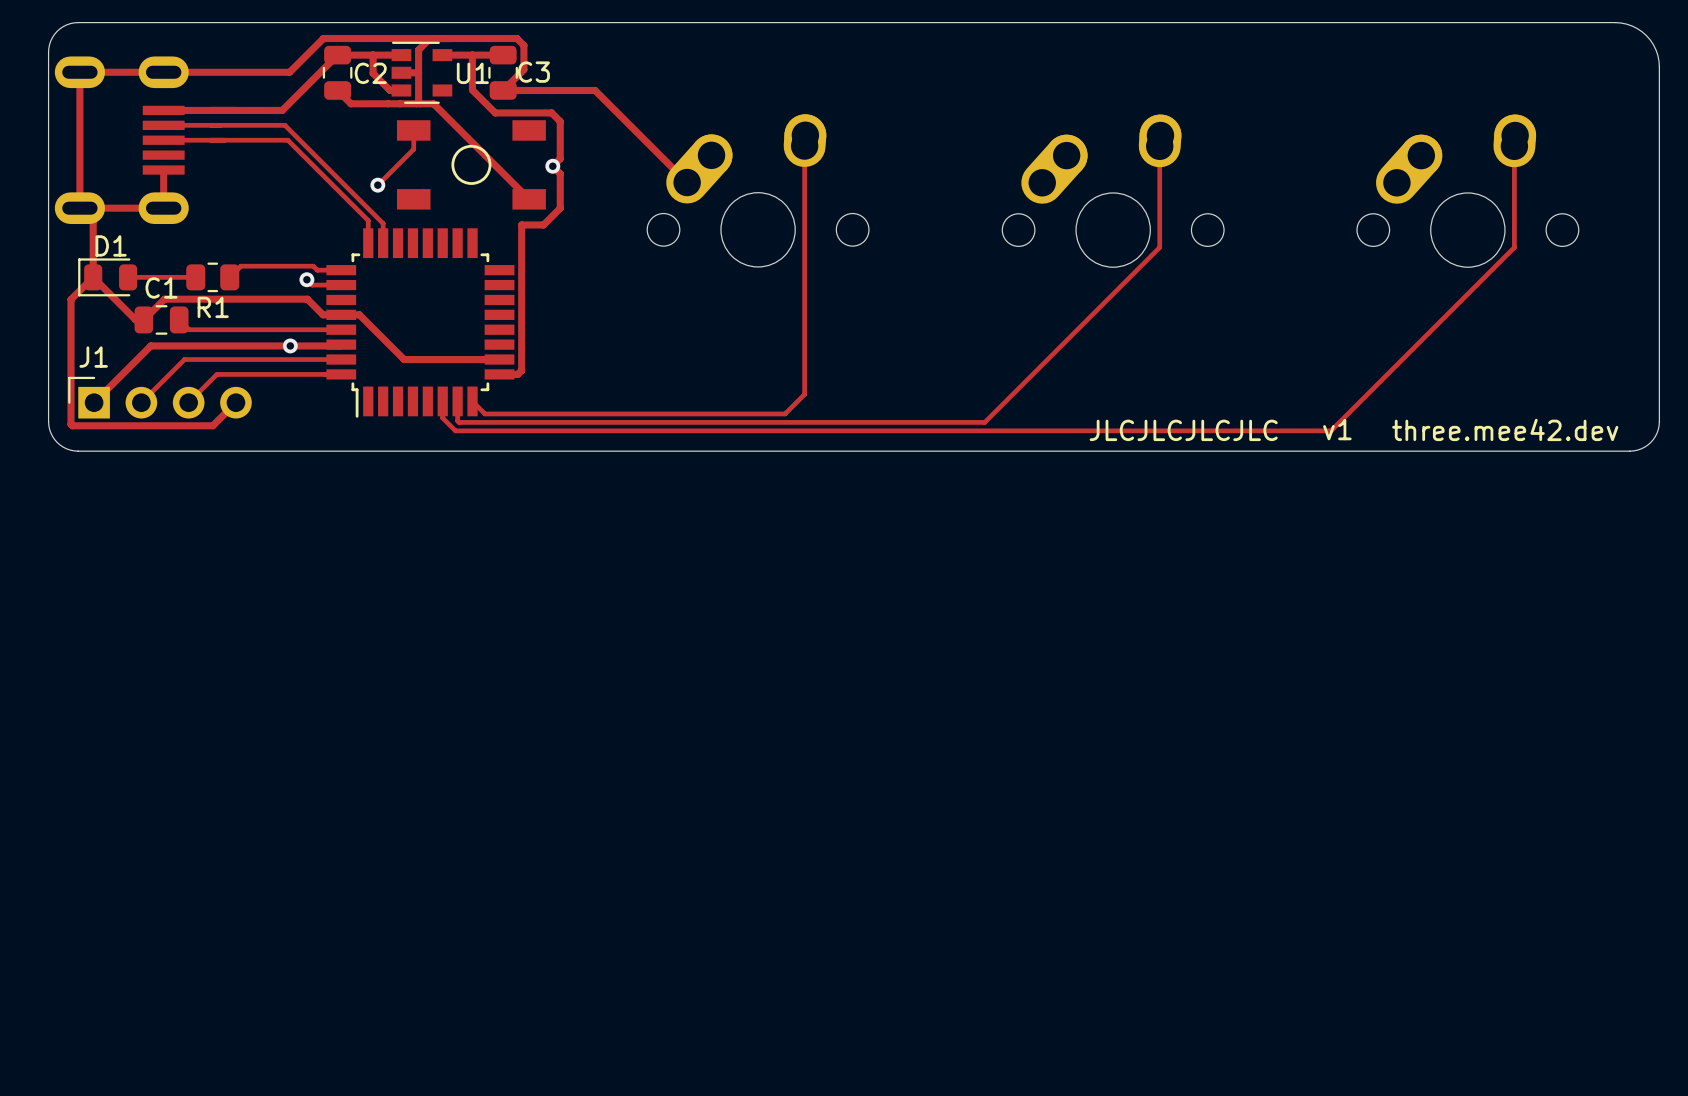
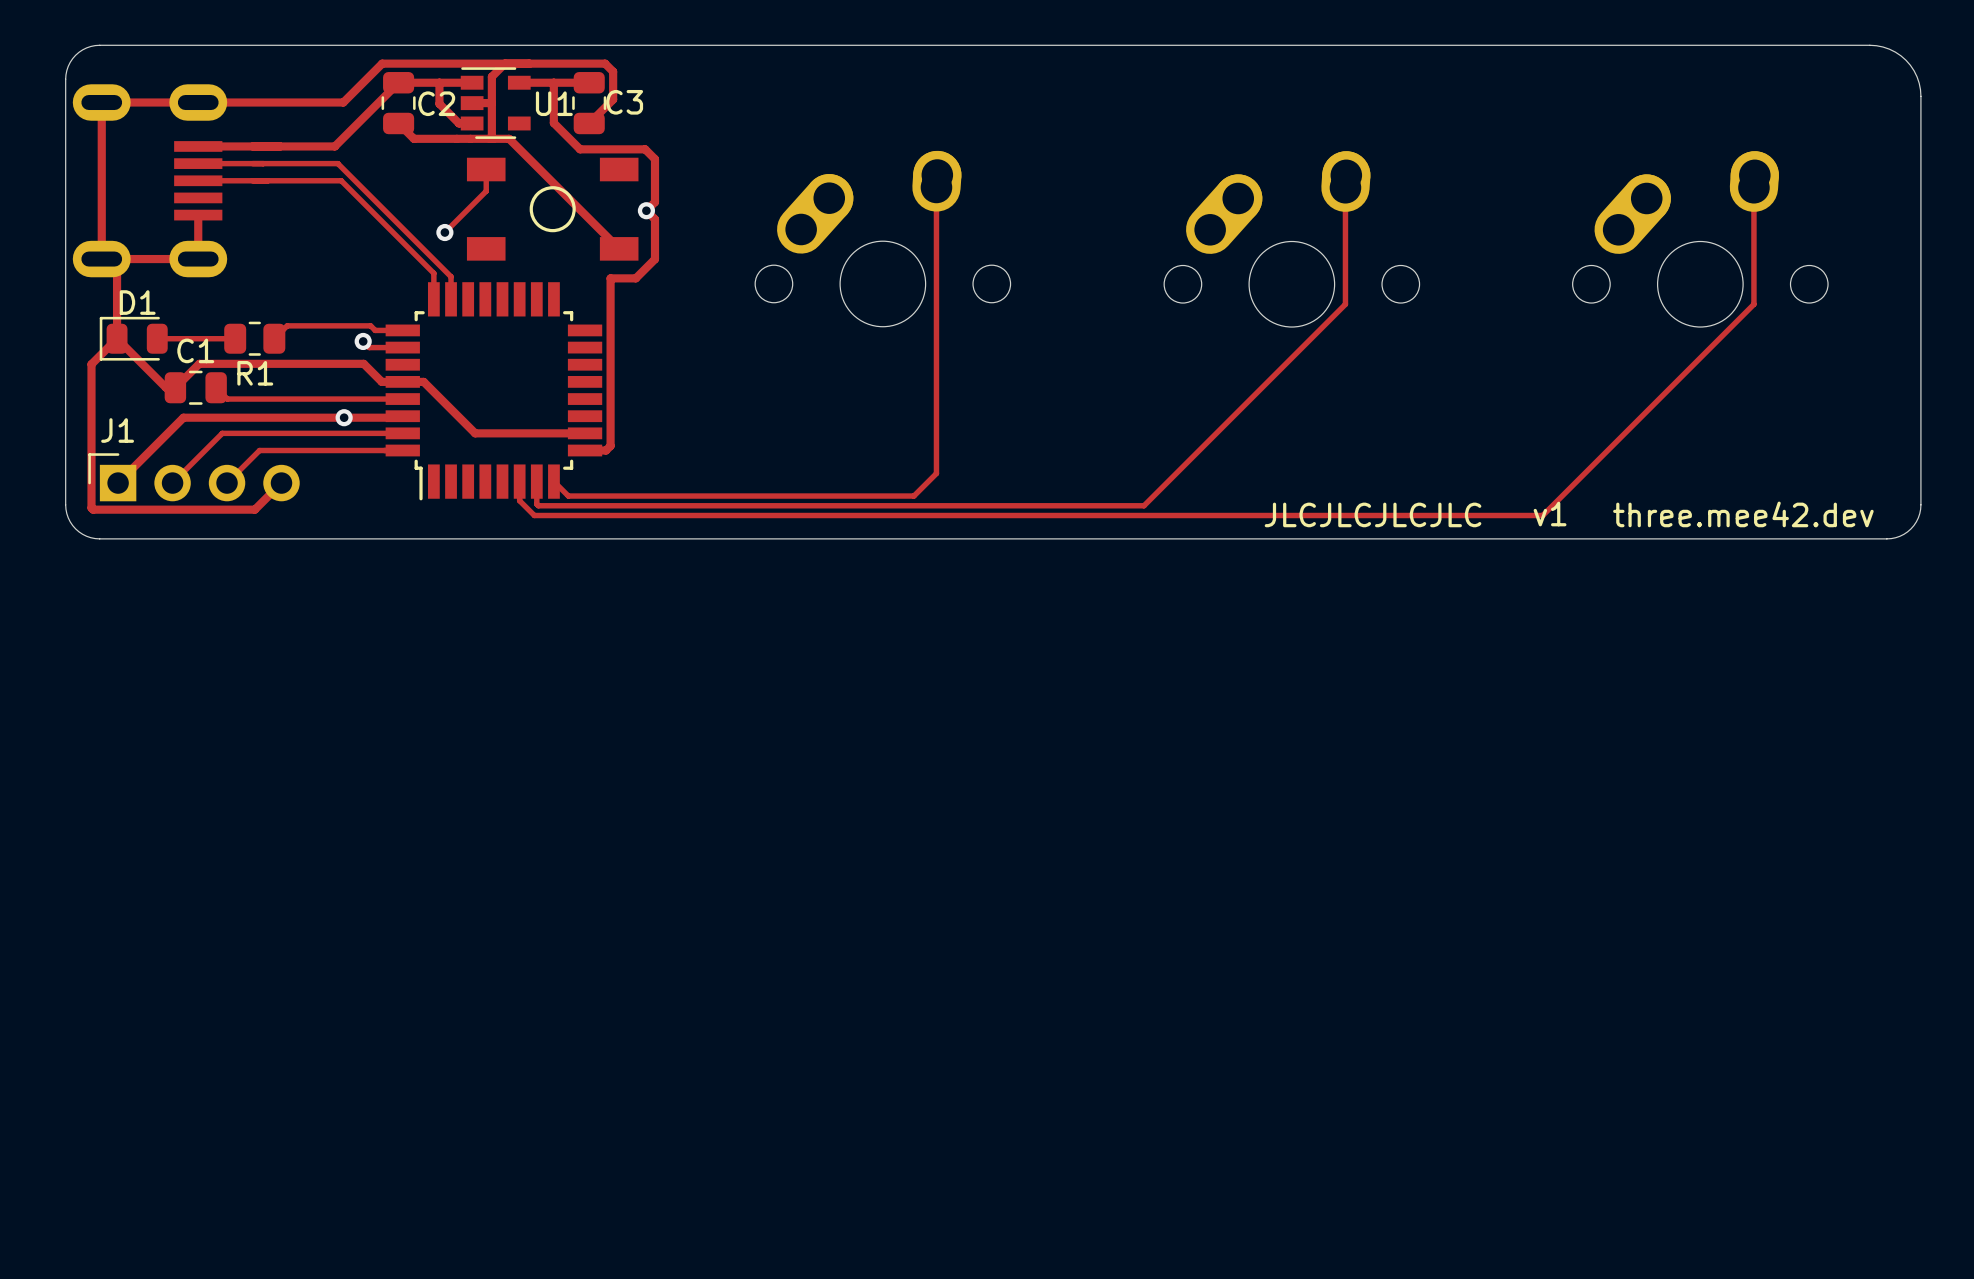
track: (503, 90) (595, 90) (687, 182) -> none

